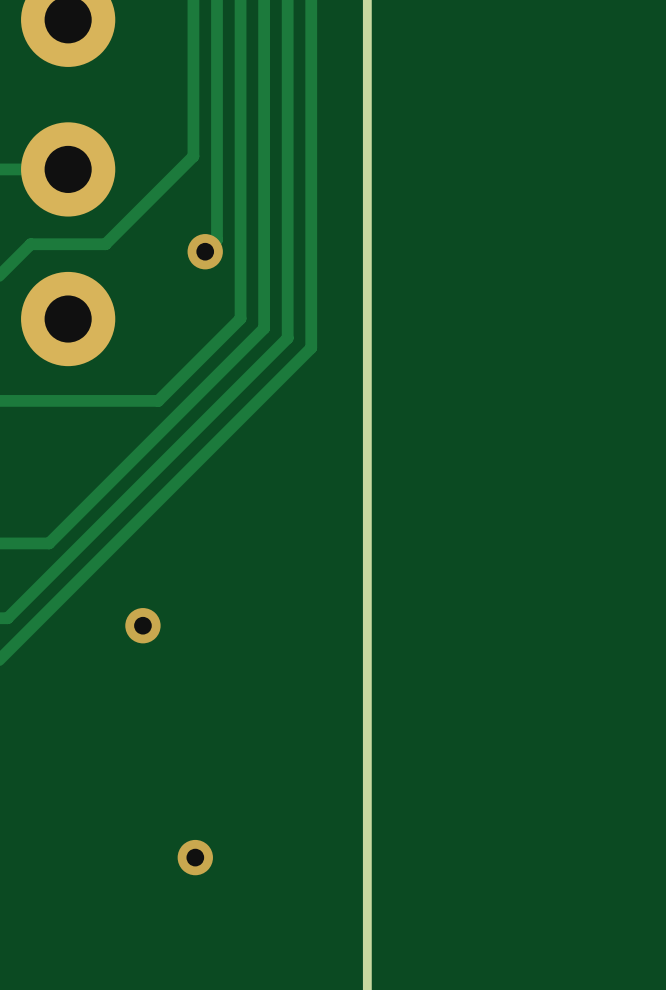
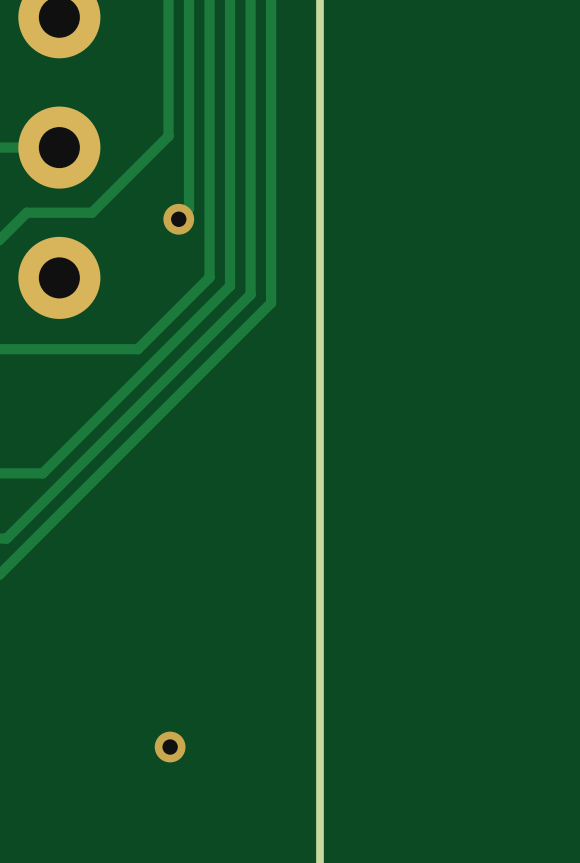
via: (142, 625) -> none

